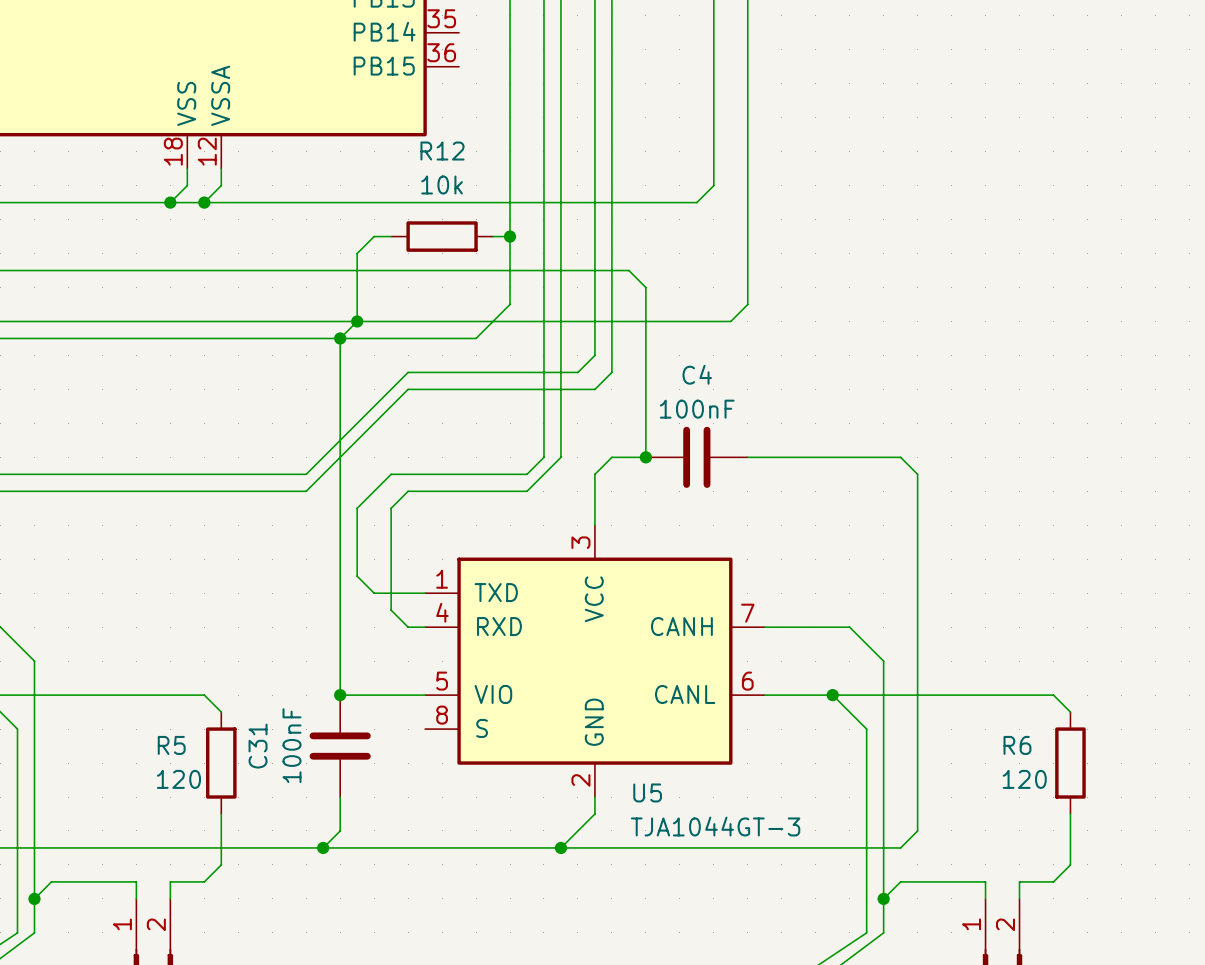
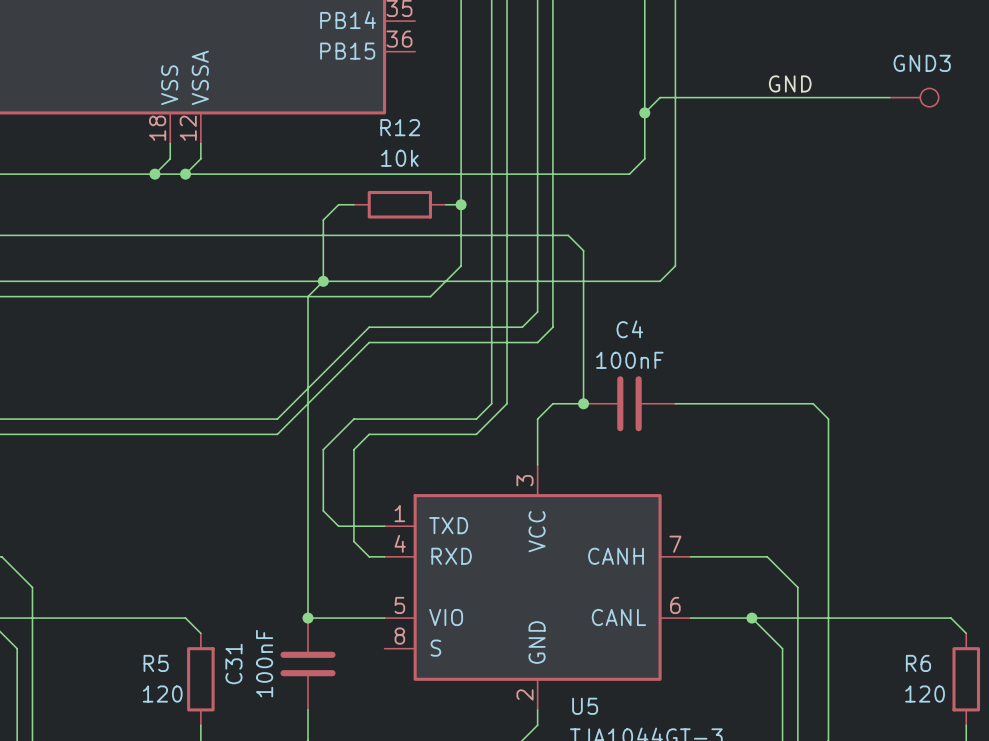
label: none -> GND (790, 83)
wire: none -> (889, 97) (660, 97) (644, 112)
GND3: none -> (914, 97)
junction: none -> (644, 112)
junction: (340, 338) -> none

